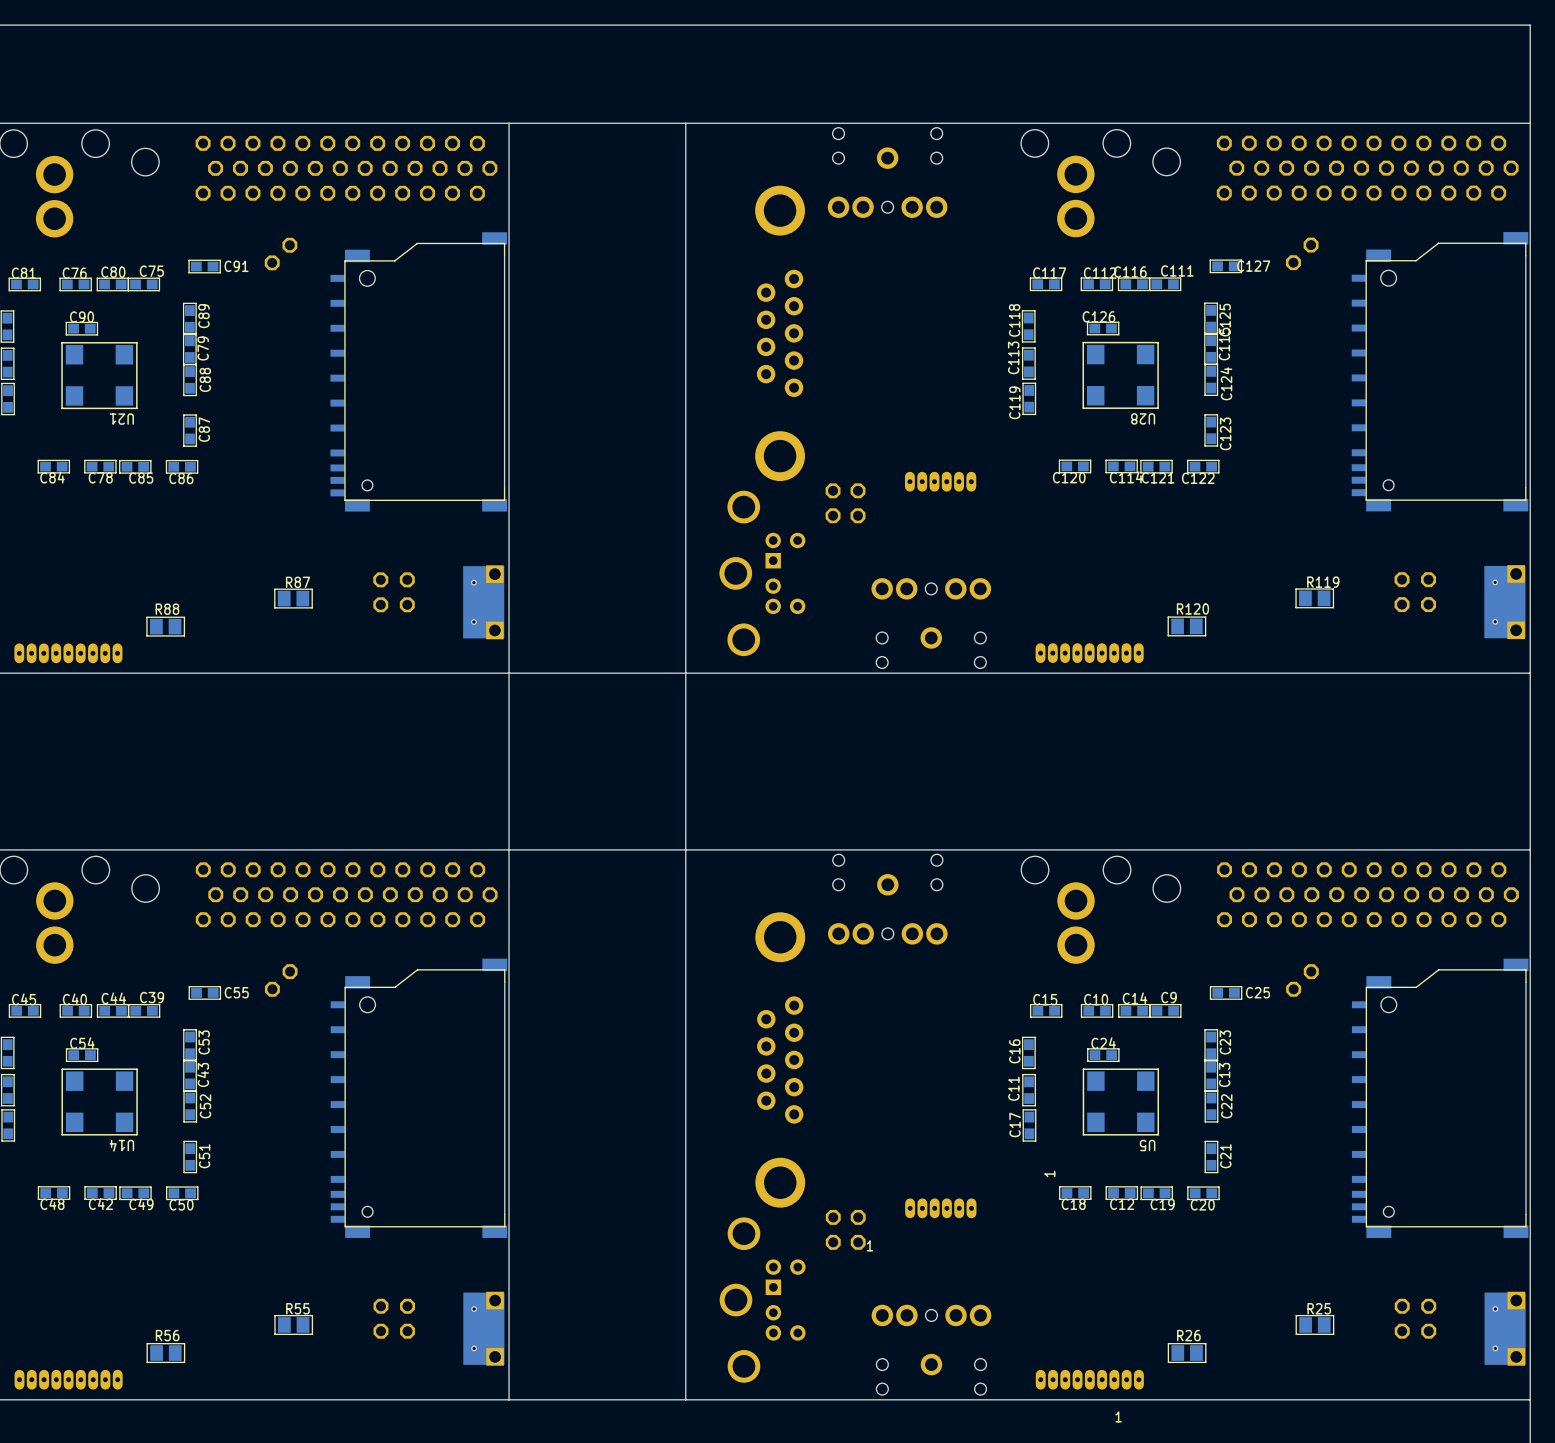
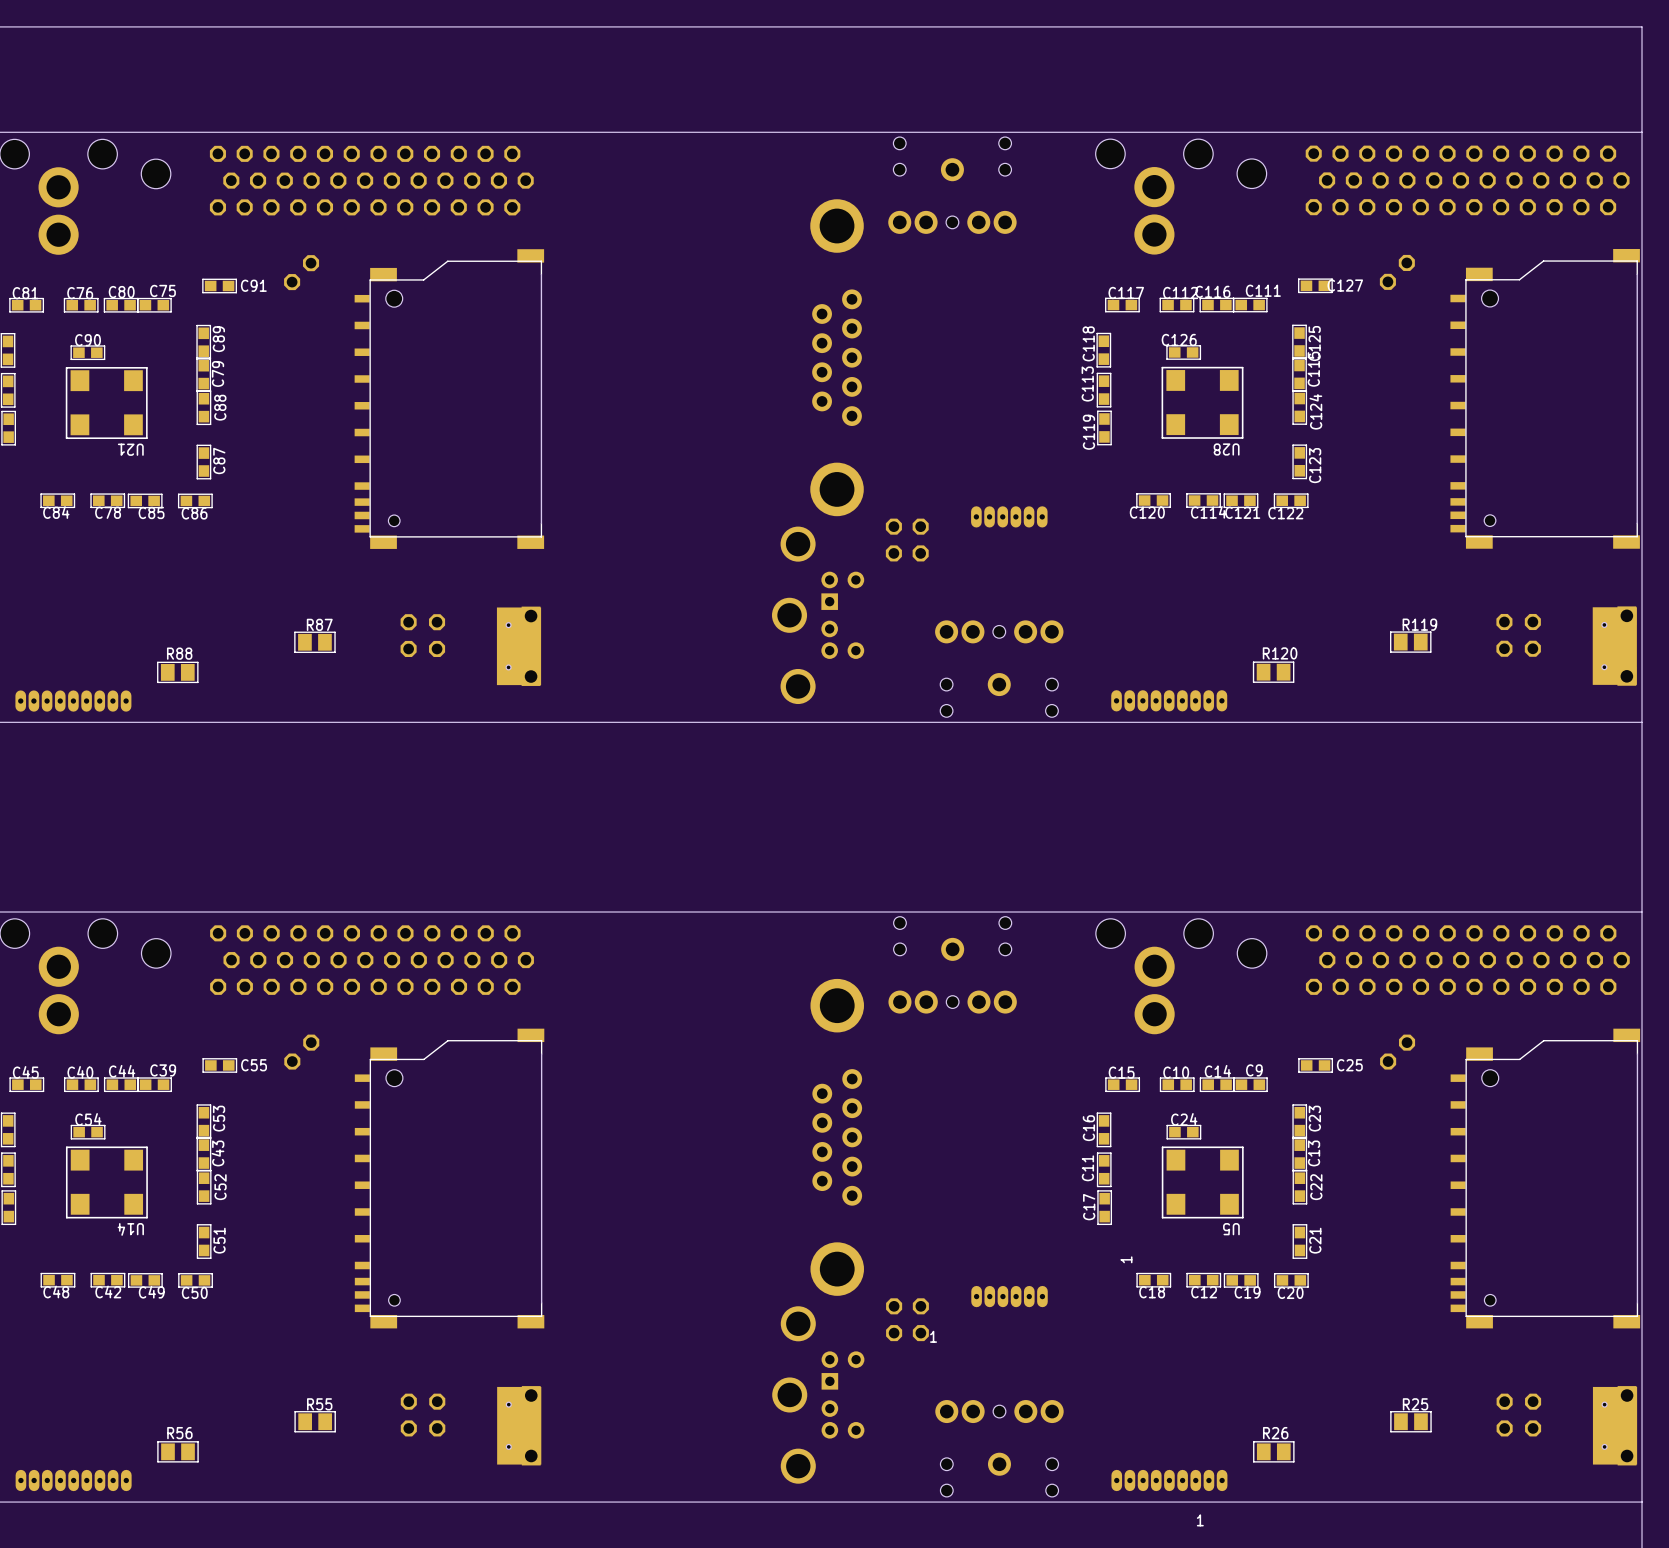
board edge: (509, 123) (509, 1399) -> none
board edge: (685, 123) (685, 1399) -> none

